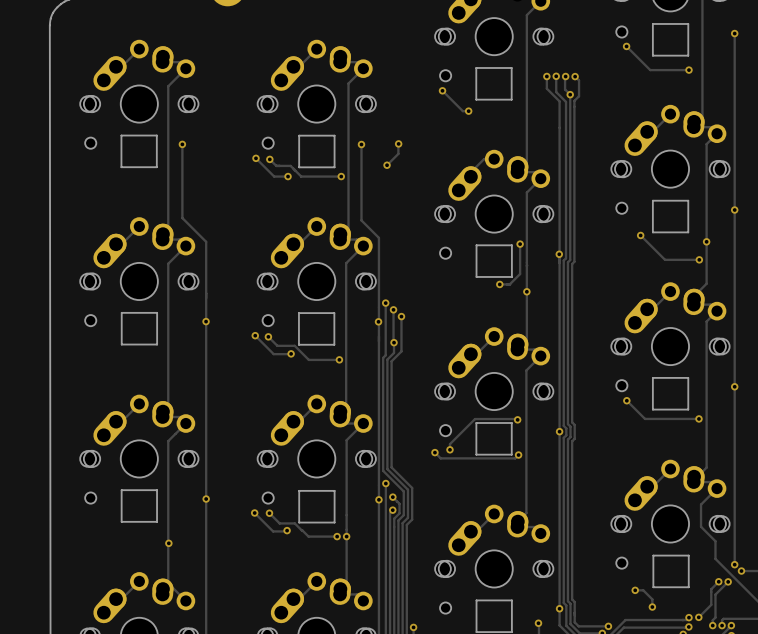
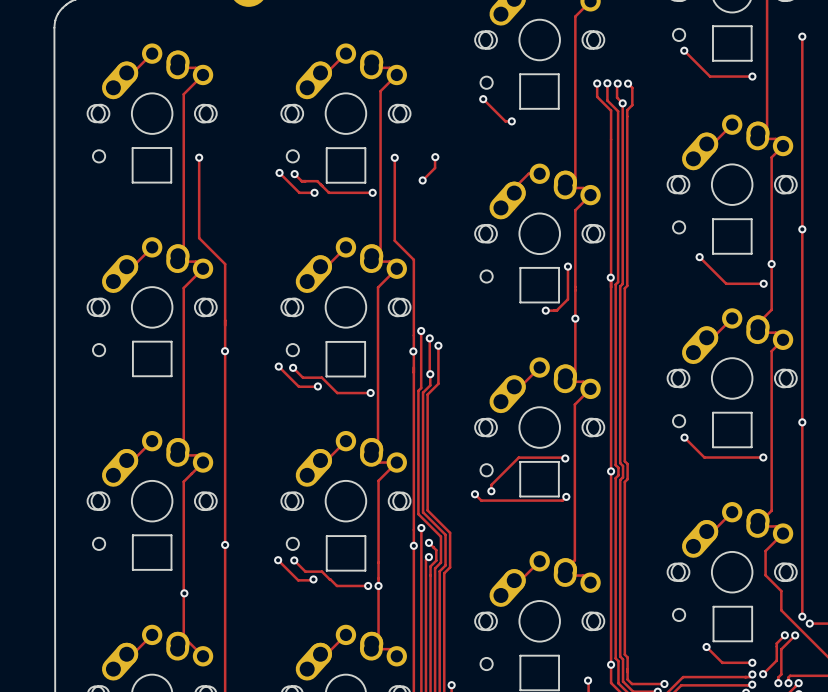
track: (635, 590) (643, 590) (652, 599) (652, 607) -> none
via: (635, 590) -> none
track: none -> (706, 647) (722, 662)
via: none -> (706, 647)
track: none -> (722, 662) (752, 662)
via: none -> (752, 662)
via: (652, 607) -> none

